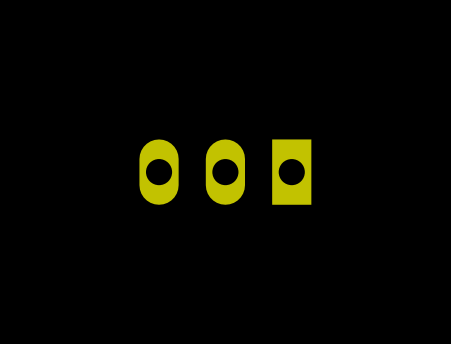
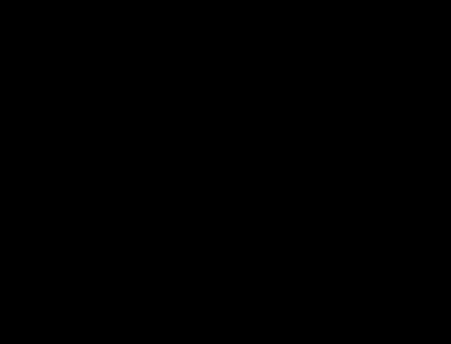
part: (225, 172) -> none

